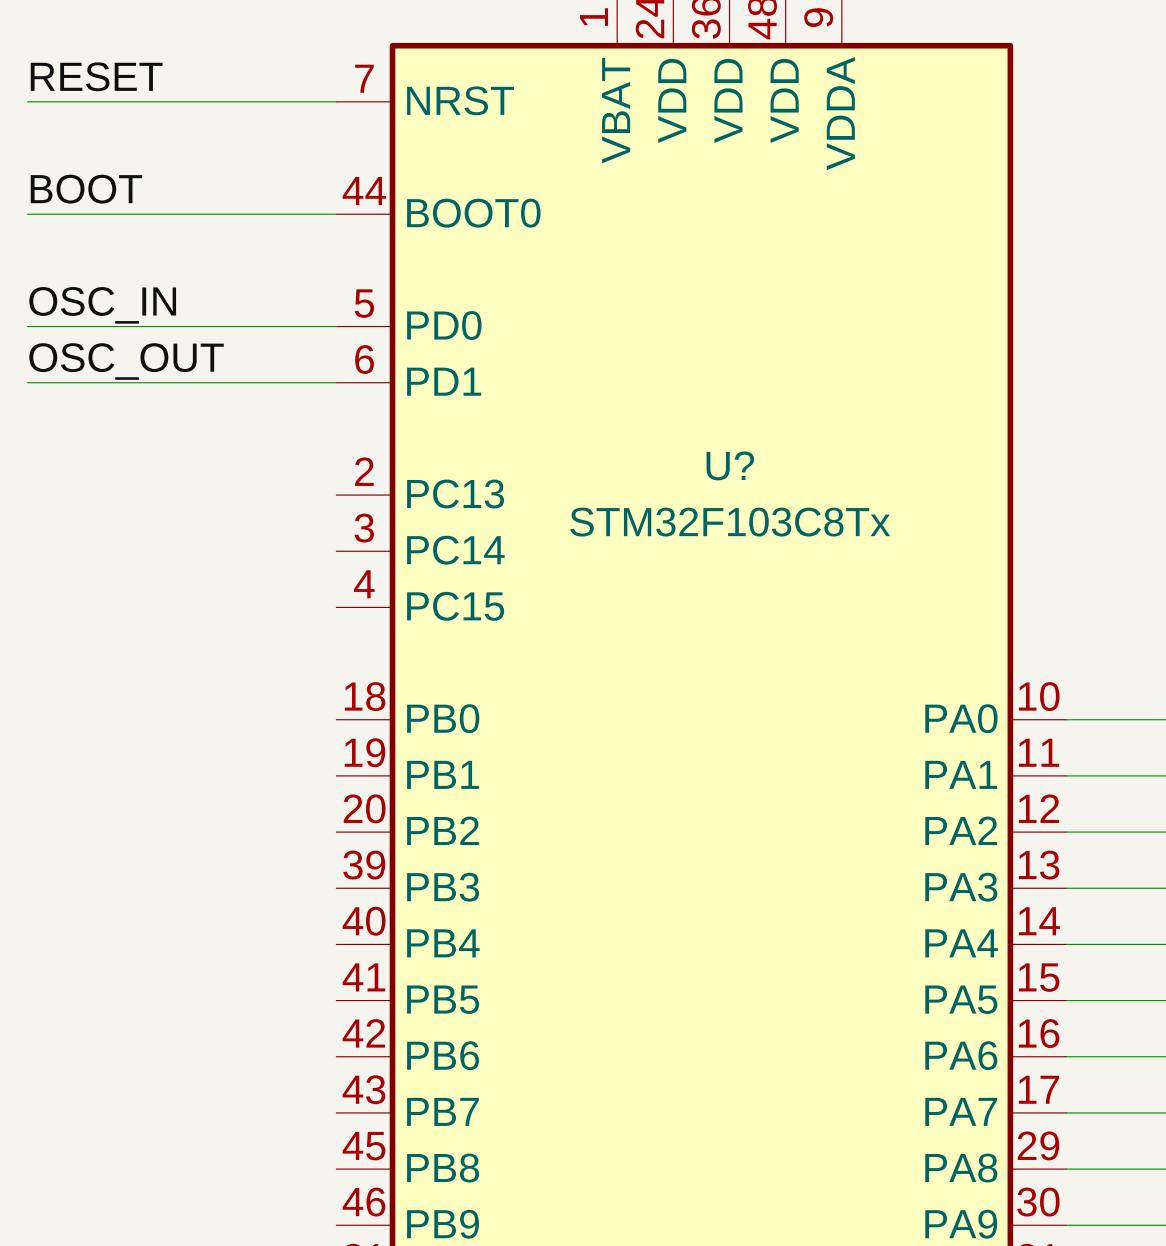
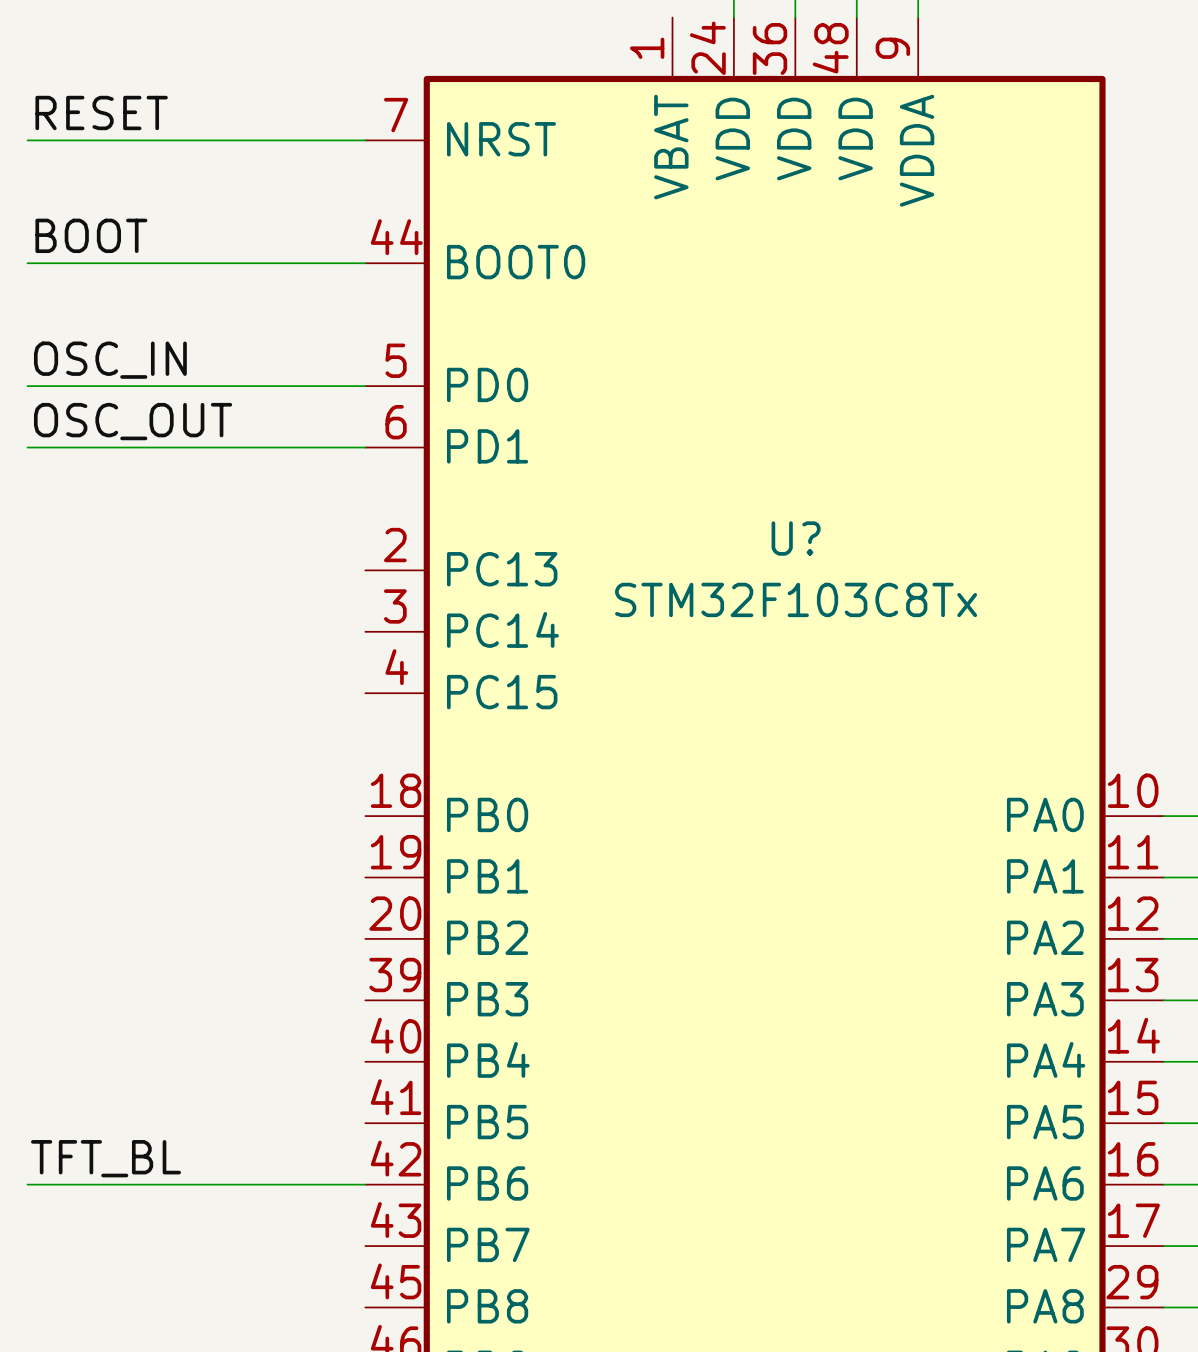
label: none -> TFT_BL (106, 1158)
wire: none -> (27, 1184) (365, 1184)

